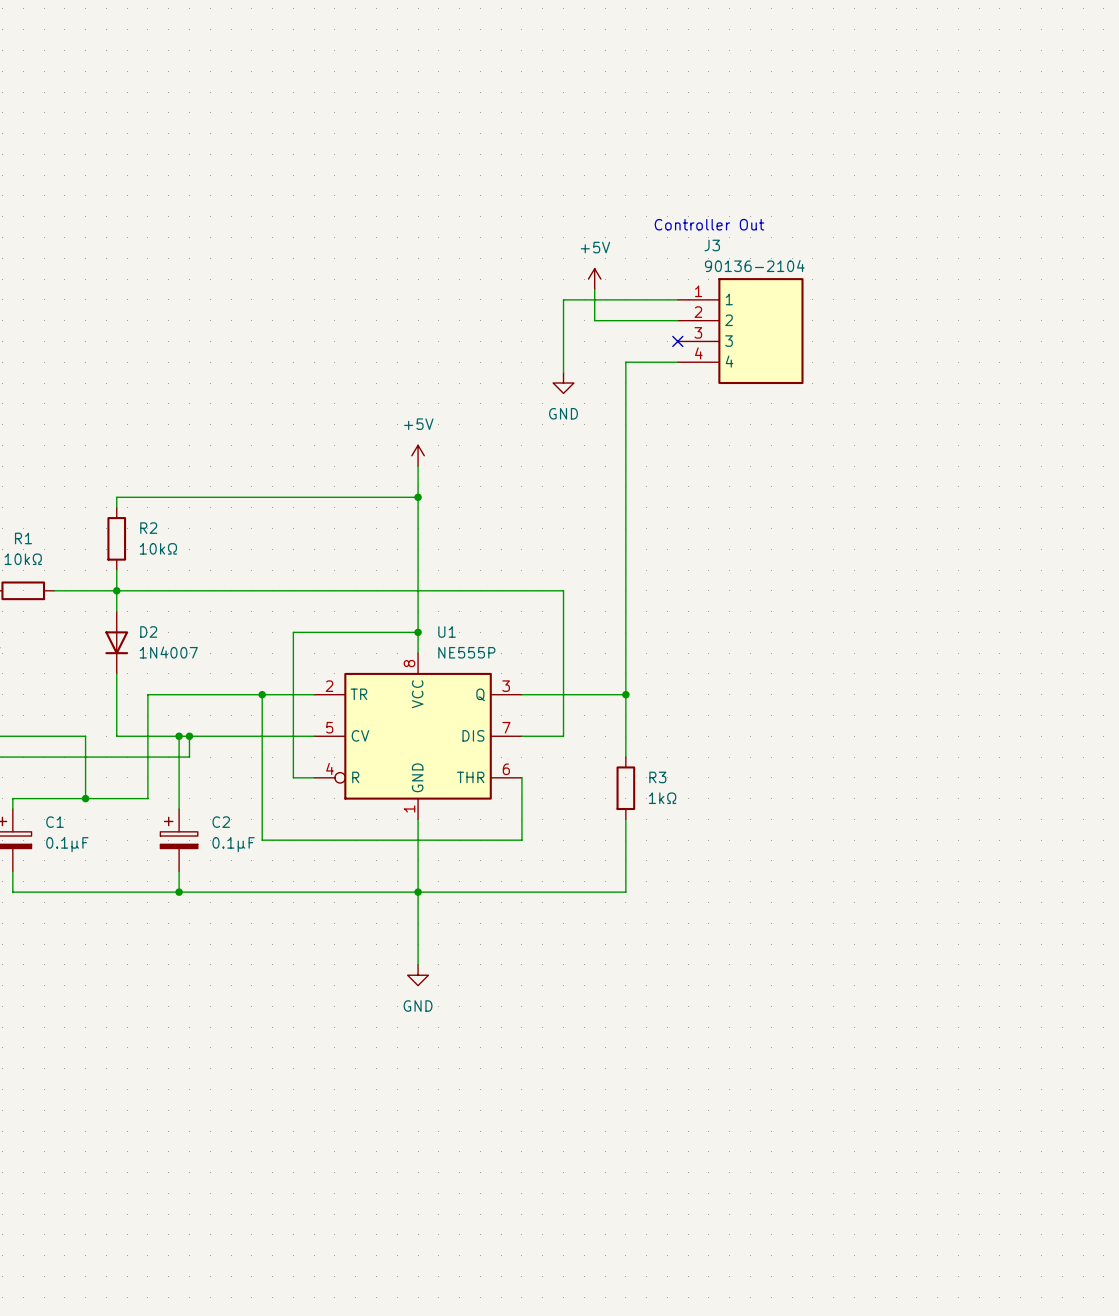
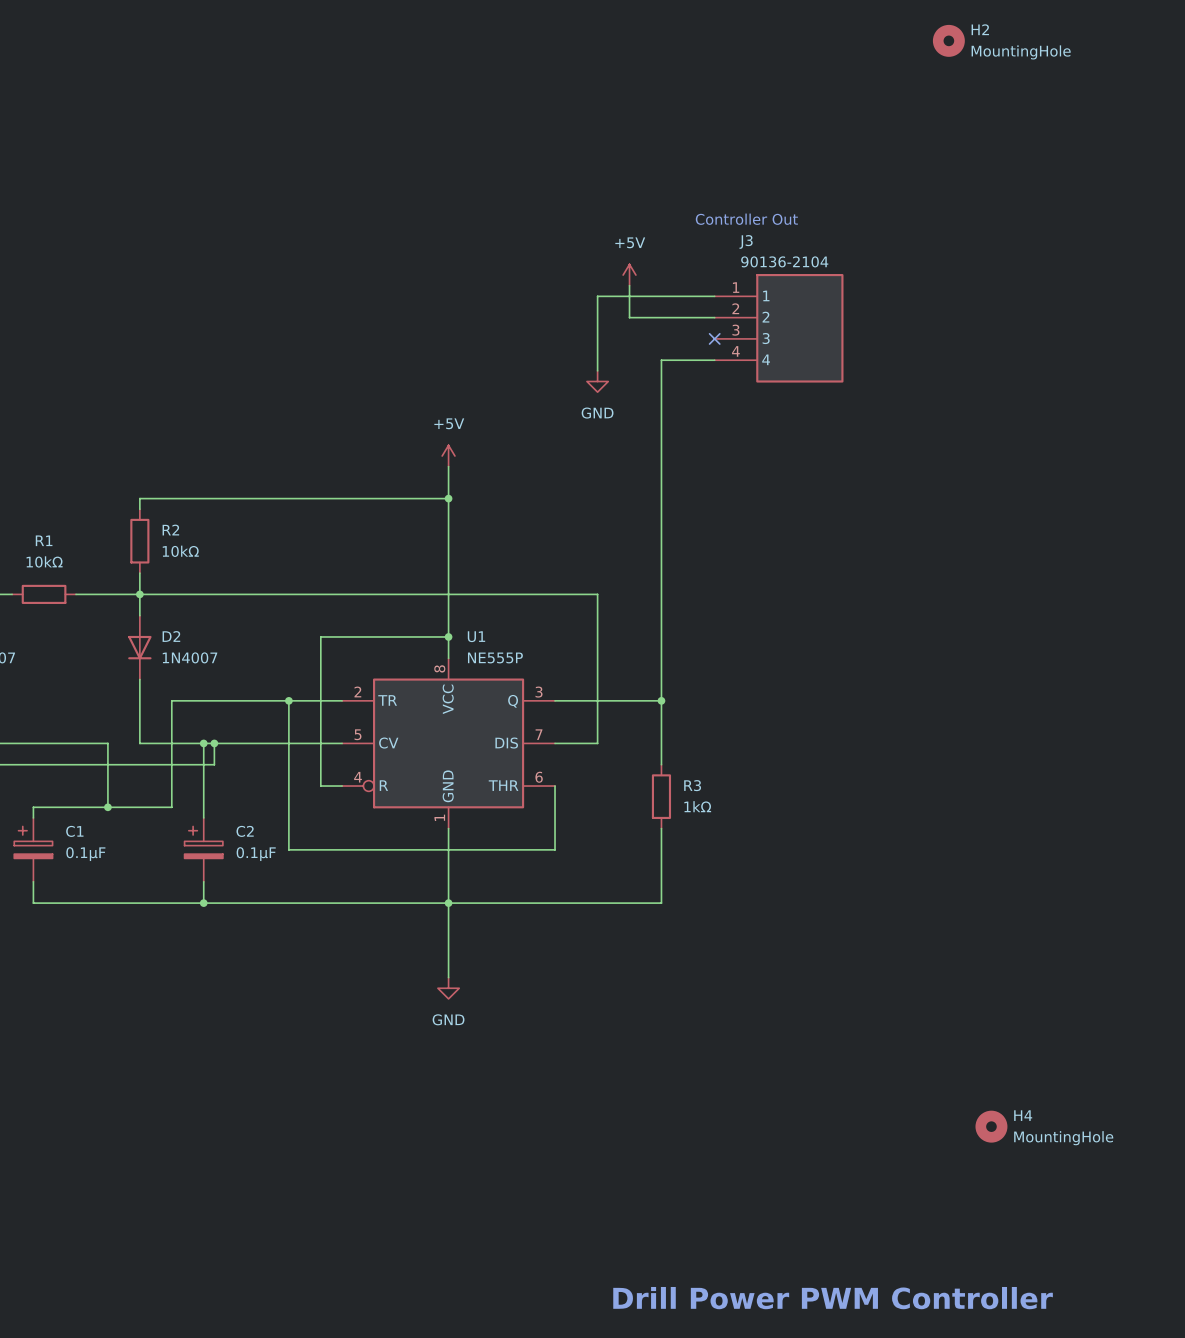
H2: none -> MountingHole (948, 40)
H4: none -> MountingHole (991, 1126)
text: none -> Drill Power PWM Controller (833, 1298)

